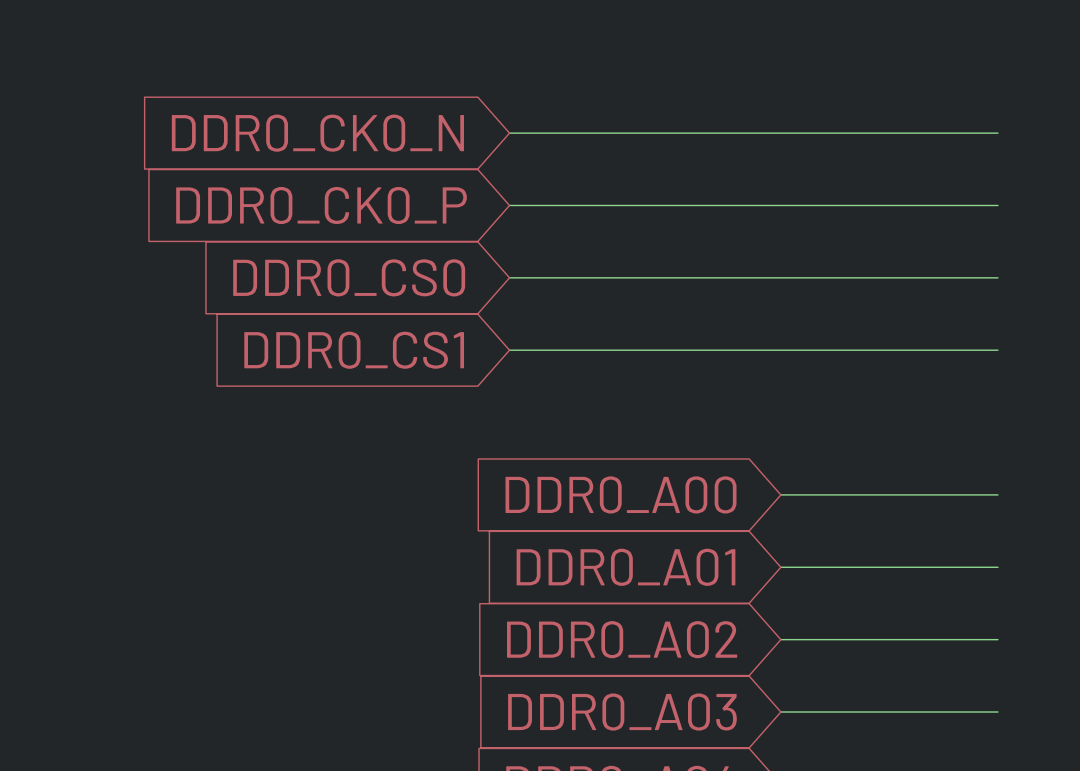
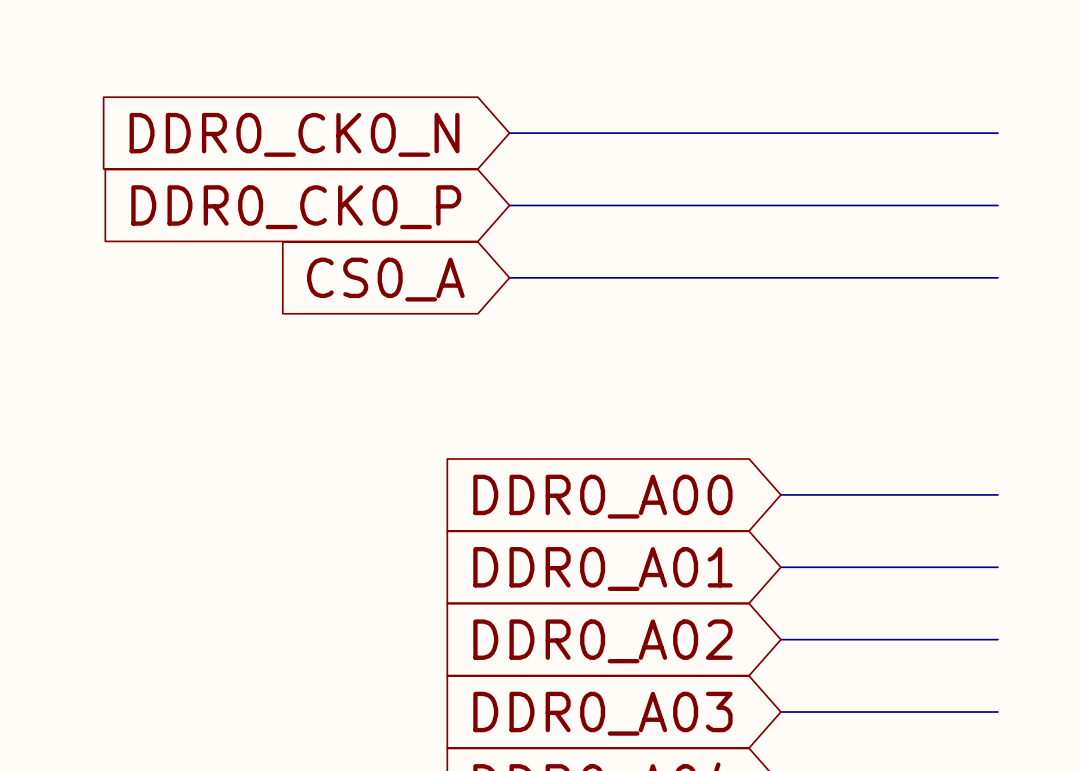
global label: DDR0_CS0 (349, 277) -> CS0_A (385, 279)
global label: DDR0_CS1 (354, 350) -> none
wire: (509, 350) (997, 350) -> none

